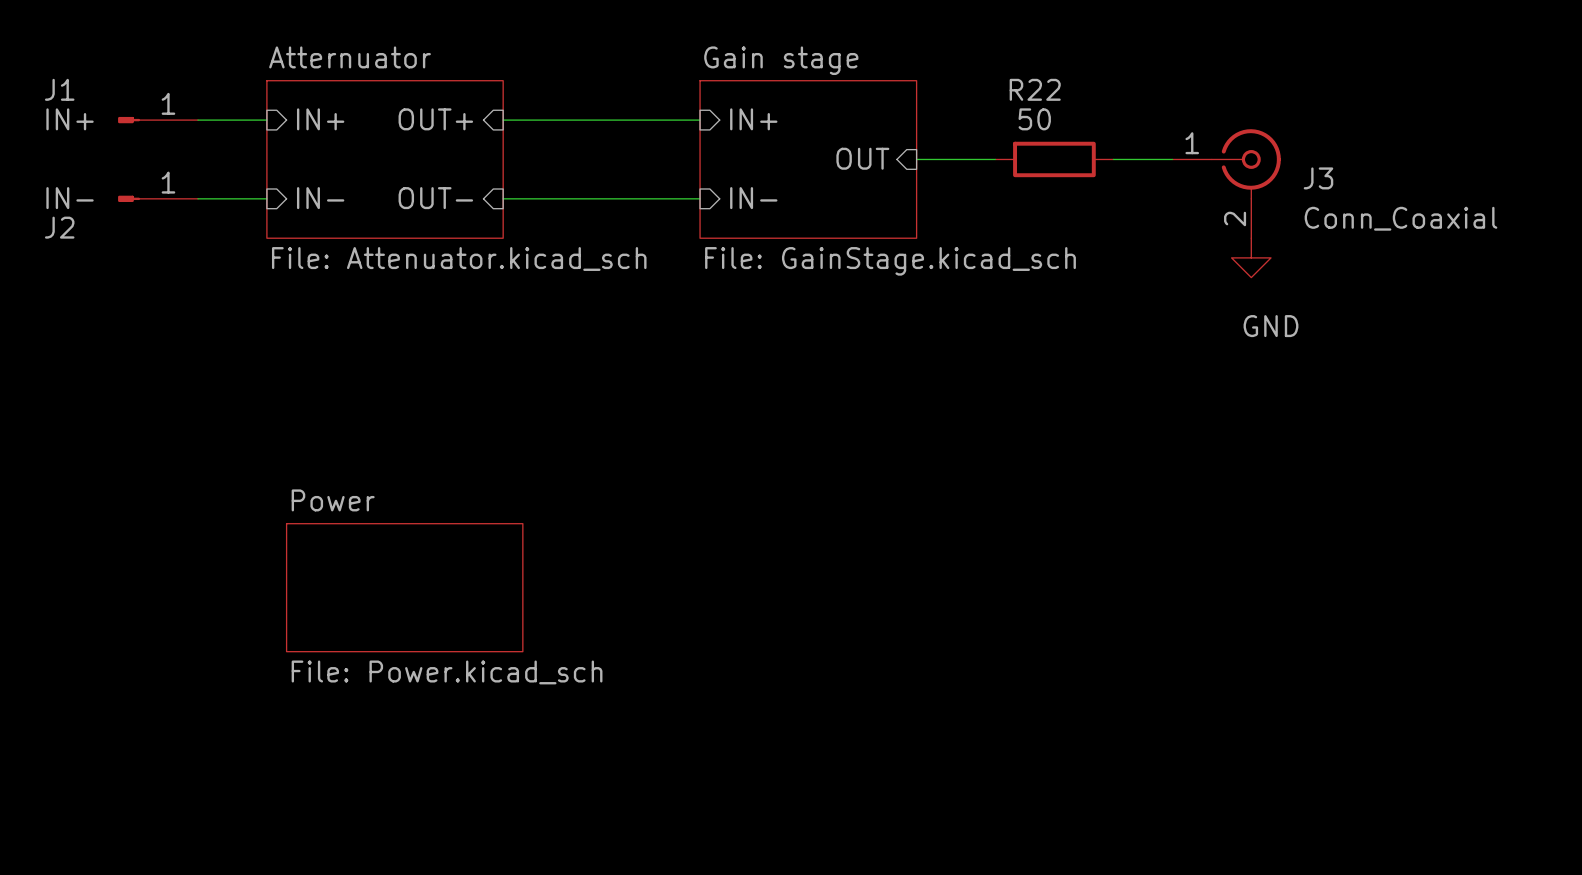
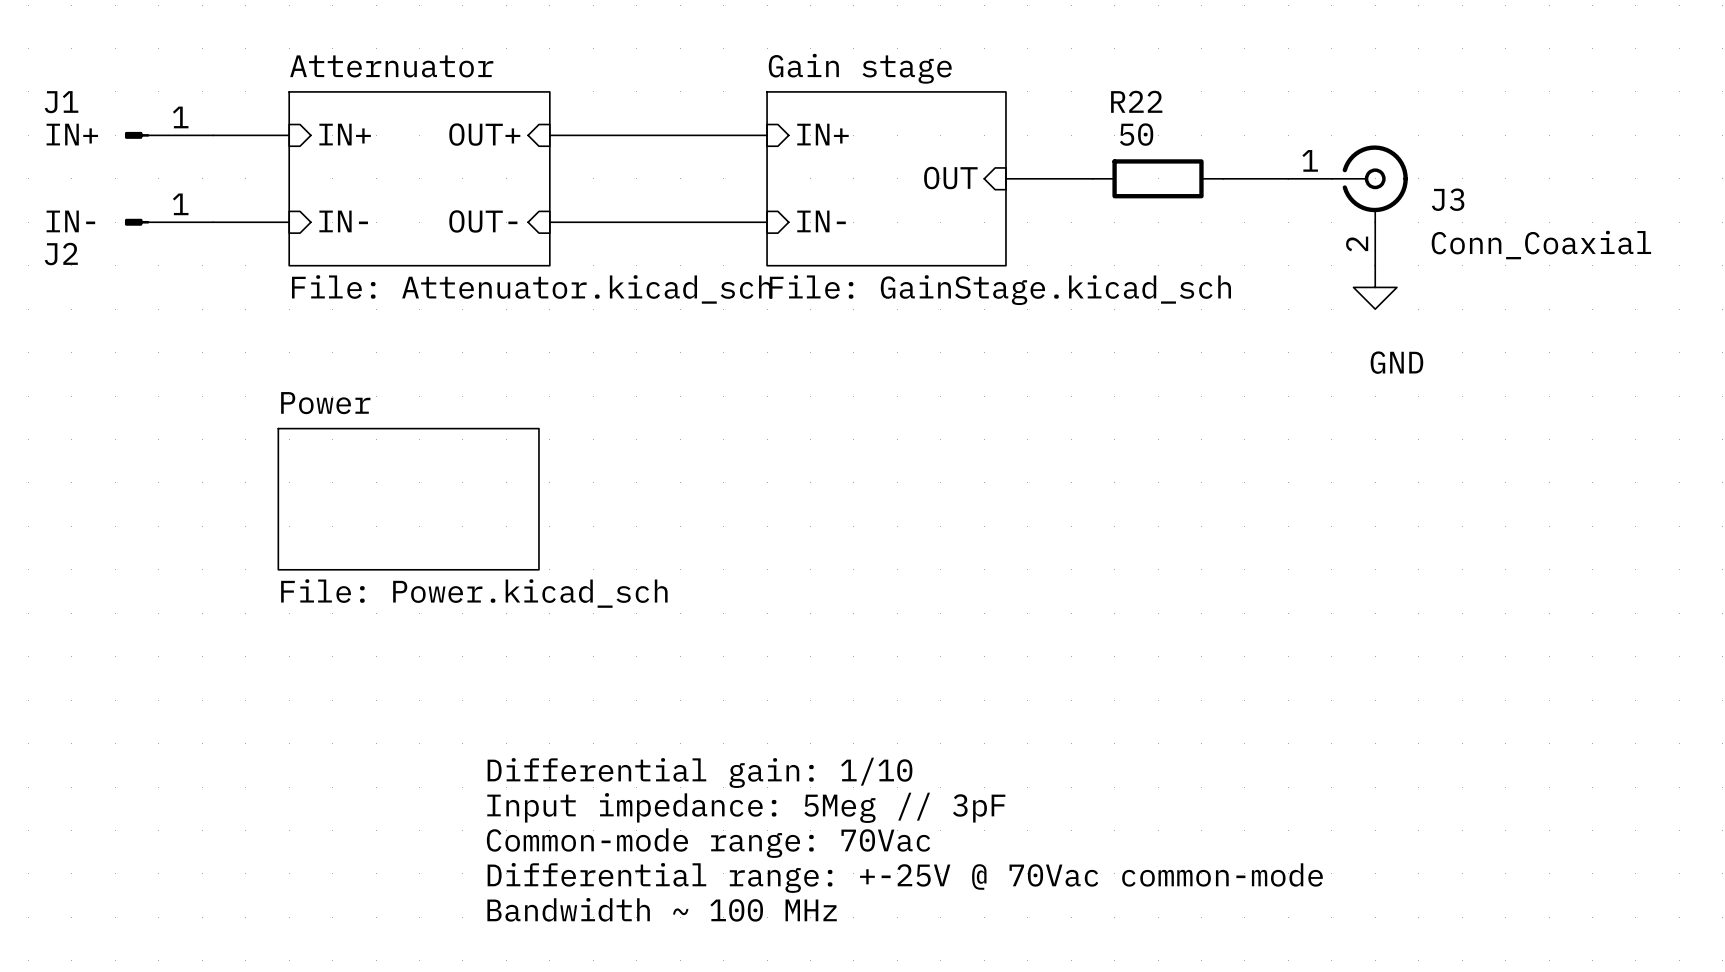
sheet Power position: (404, 587) -> (408, 499)
text: none -> Differential gain: 1/10 (700, 772)
text: none -> Input impedance: 5Meg // 3pF (746, 807)
text: none -> Common-mode range: 70Vac (708, 843)
text: none -> Differential range: +-25V @ 70Vac common-mode (905, 877)
text: none -> Bandwidth ~ 100 MHz (662, 909)

